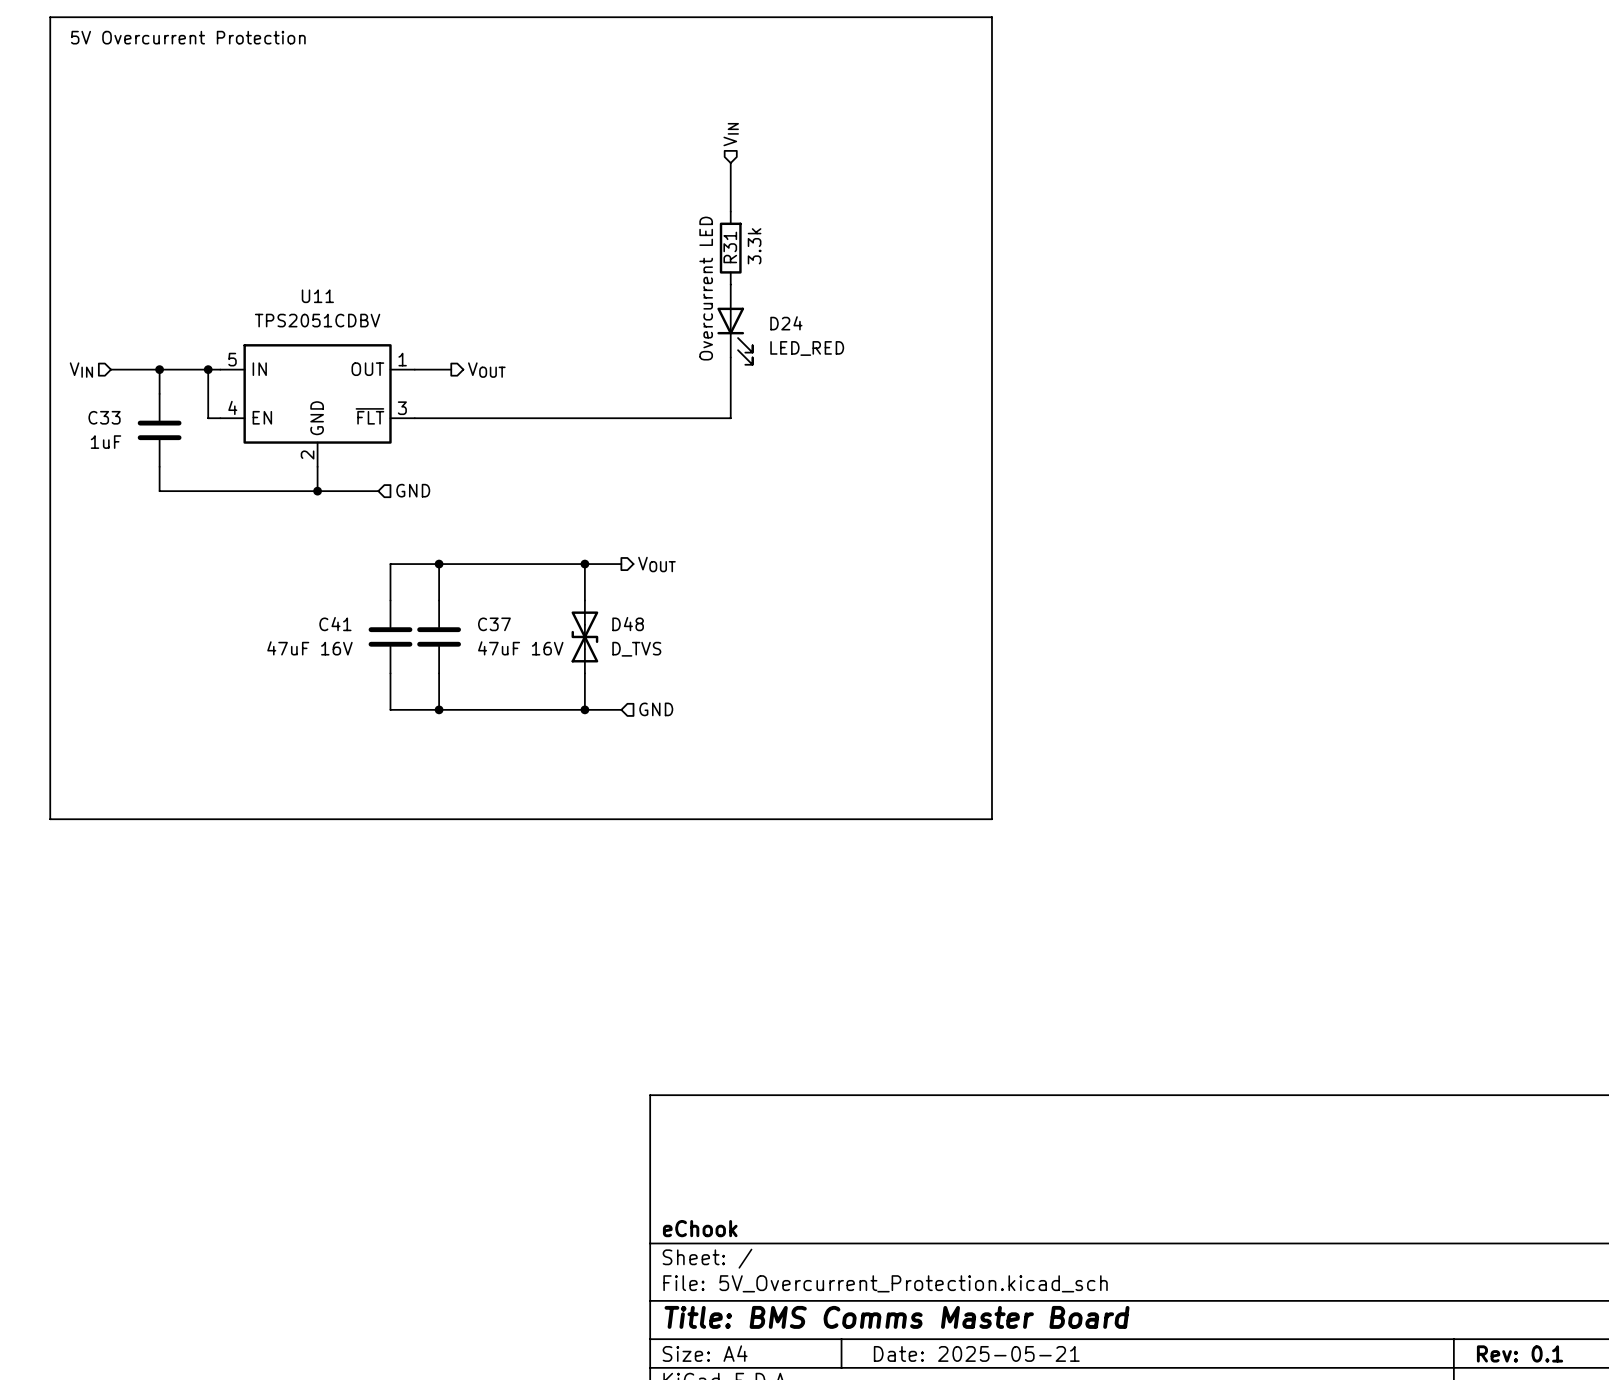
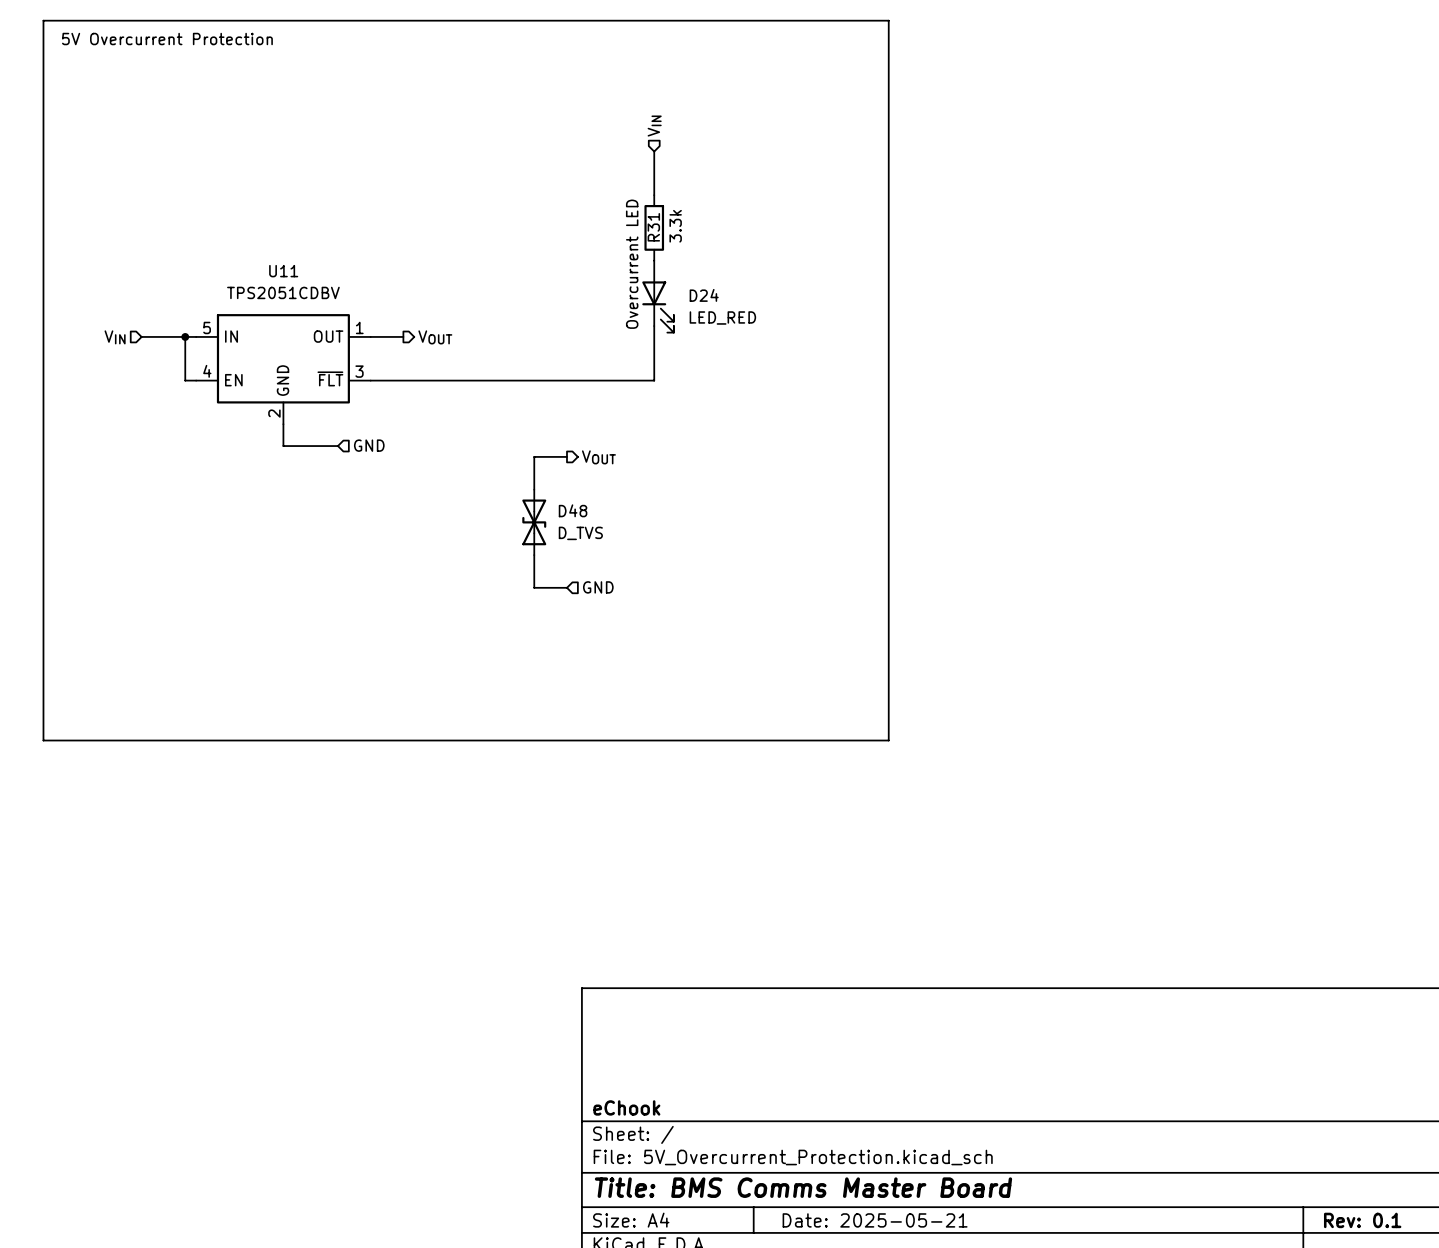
wire: (111, 369) (159, 369) (159, 393) -> none
junction: (159, 369) -> none
hierarchical label position: VIN (81, 370) -> VIN (115, 337)
C33: 1uF (159, 430) -> none
wire: (159, 466) (159, 491) (317, 491) -> none
junction: (317, 491) -> none
wire: none -> (566, 456) (534, 456) (534, 489)
wire: (439, 564) (439, 600) -> none
junction: (439, 564) -> none
wire: (584, 564) (584, 600) -> none
junction: (584, 564) -> none
wire: (621, 564) (390, 564) (390, 600) -> none
hierarchical label position: VOUT (656, 564) -> VOUT (598, 457)
wire: none -> (534, 555) (534, 587) (566, 587)
C41: 47uF 16V (390, 636) -> none
C37: 47uF 16V (439, 636) -> none
D48 position: (584, 636) -> (534, 522)
wire: (390, 673) (390, 709) (621, 709) -> none
wire: (439, 673) (439, 709) -> none
wire: (584, 673) (584, 709) -> none
junction: (439, 709) -> none
junction: (584, 709) -> none
hierarchical label position: GND (656, 709) -> GND (598, 587)

